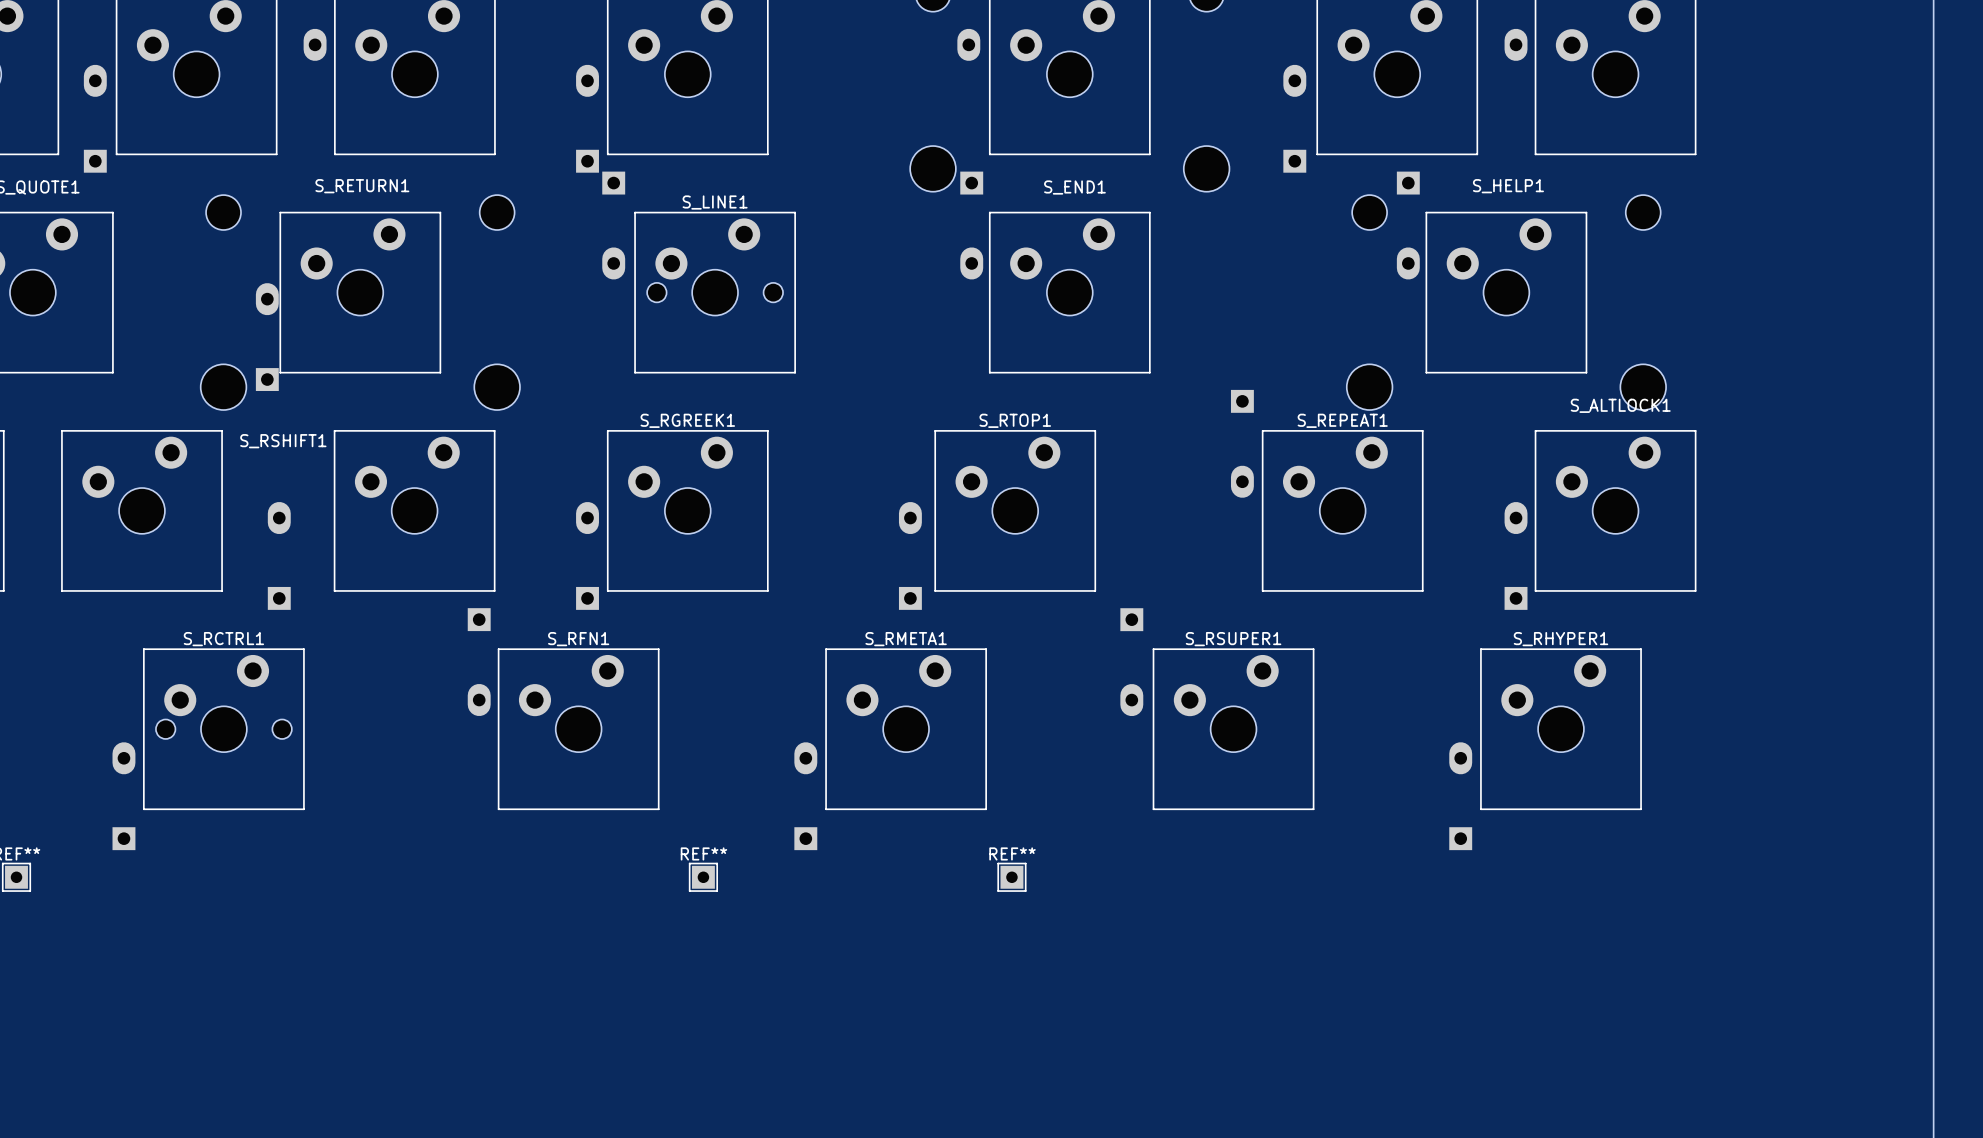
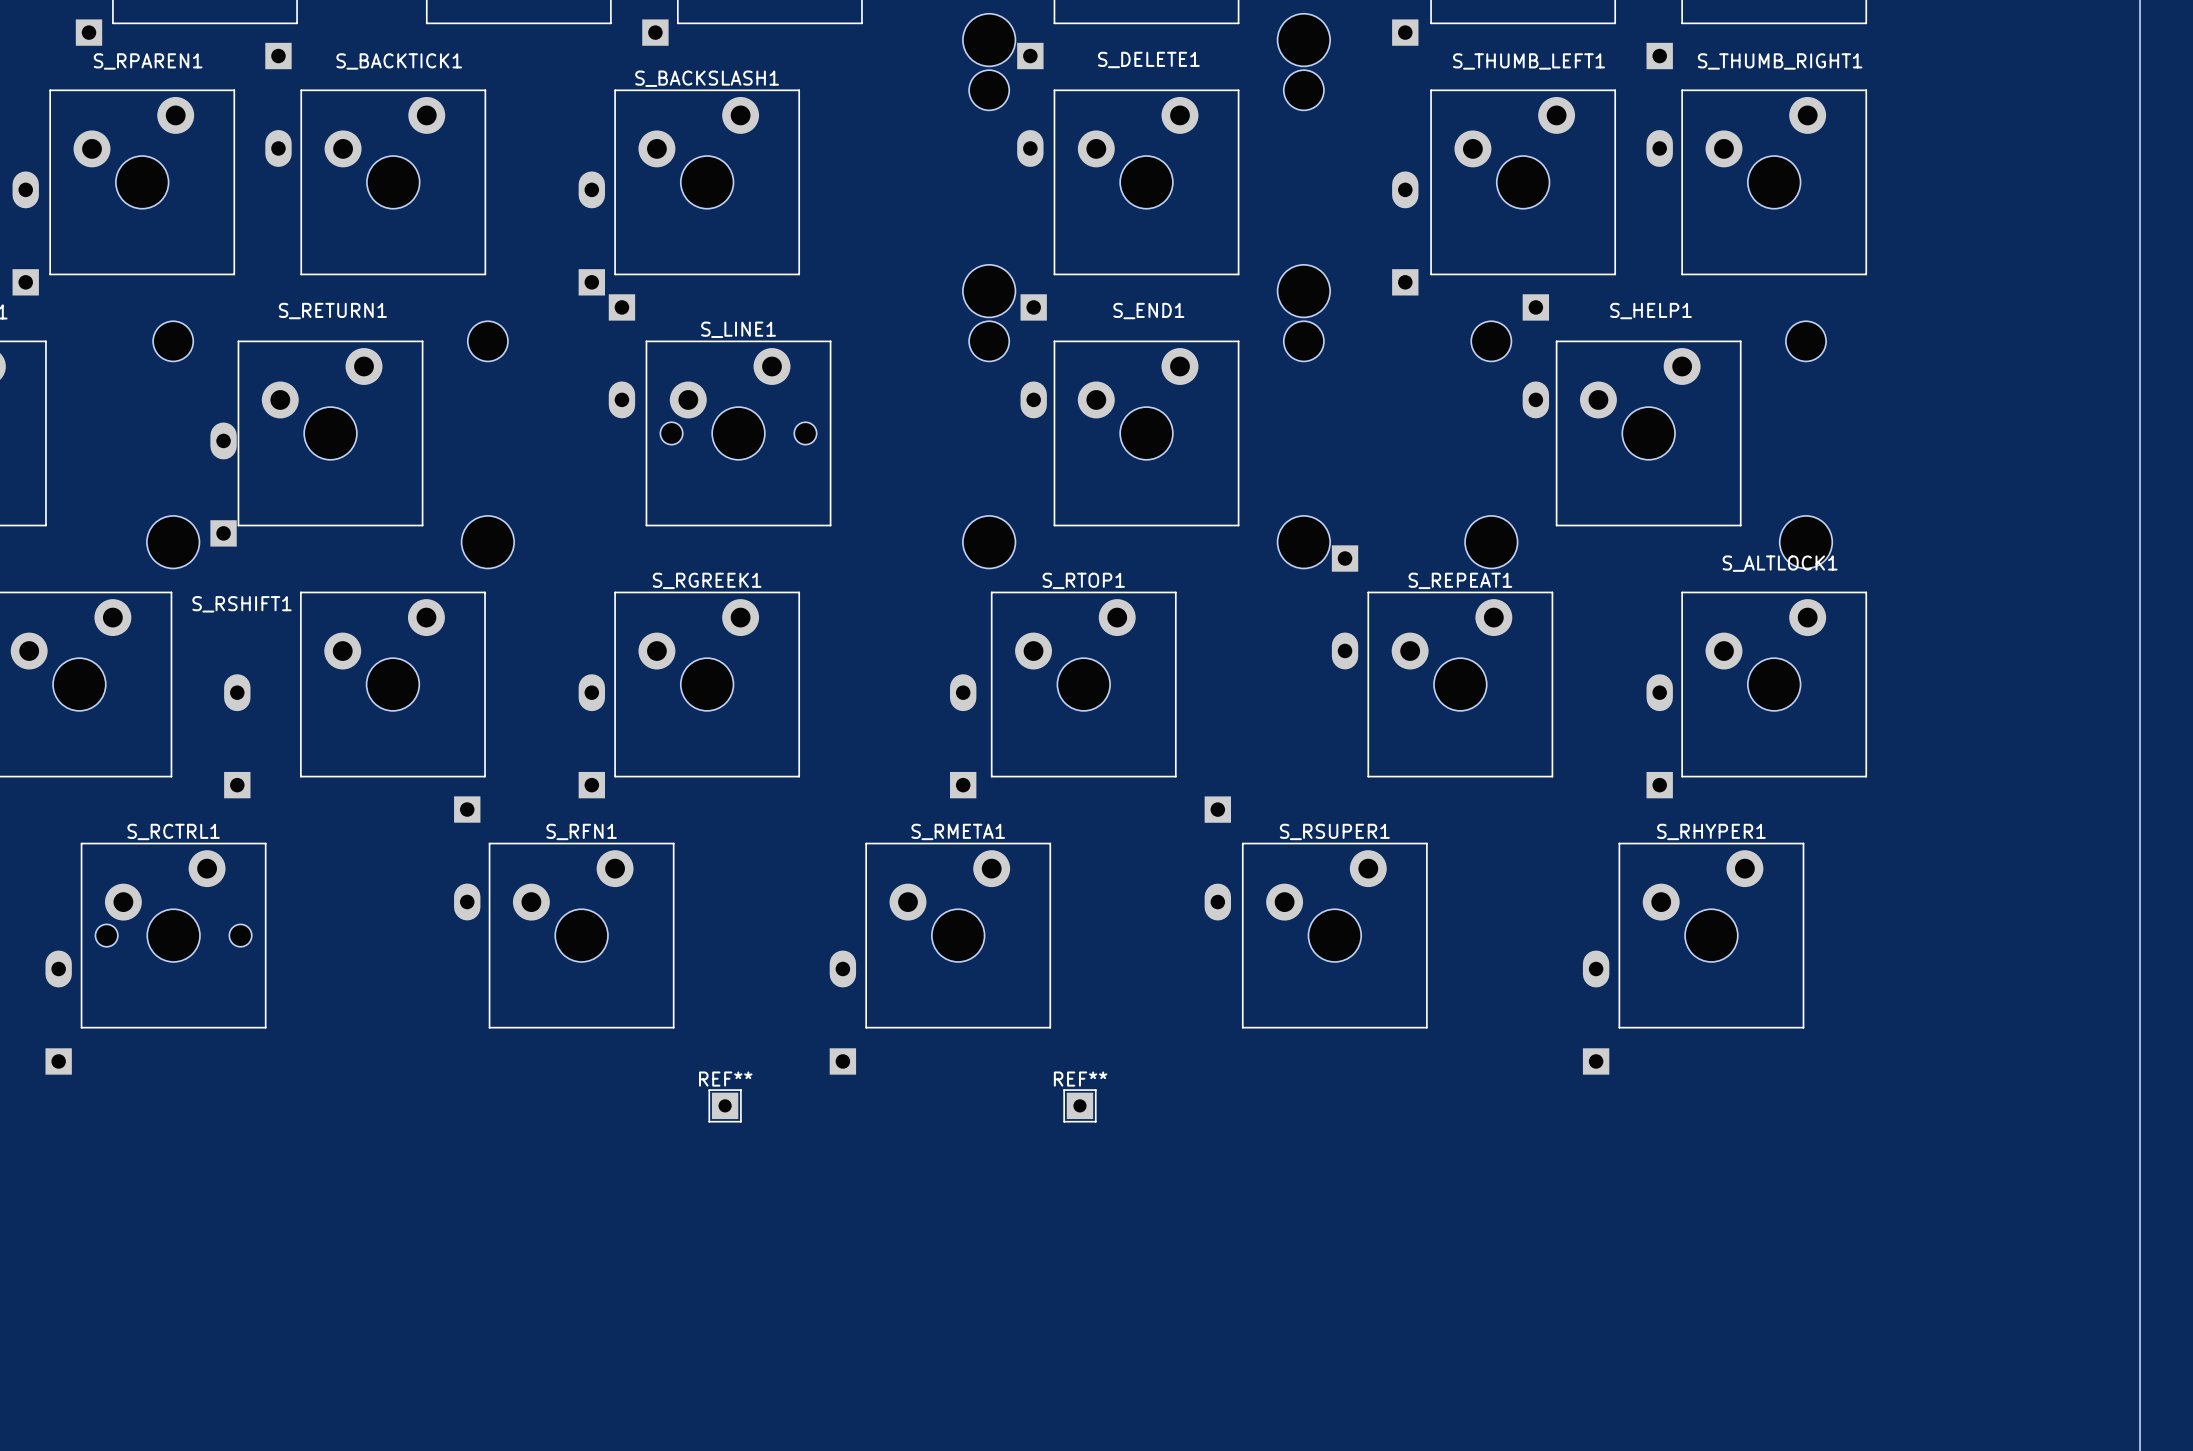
S_END1 footprint: [989, 211, 1151, 374] -> [962, 321, 1331, 569]

